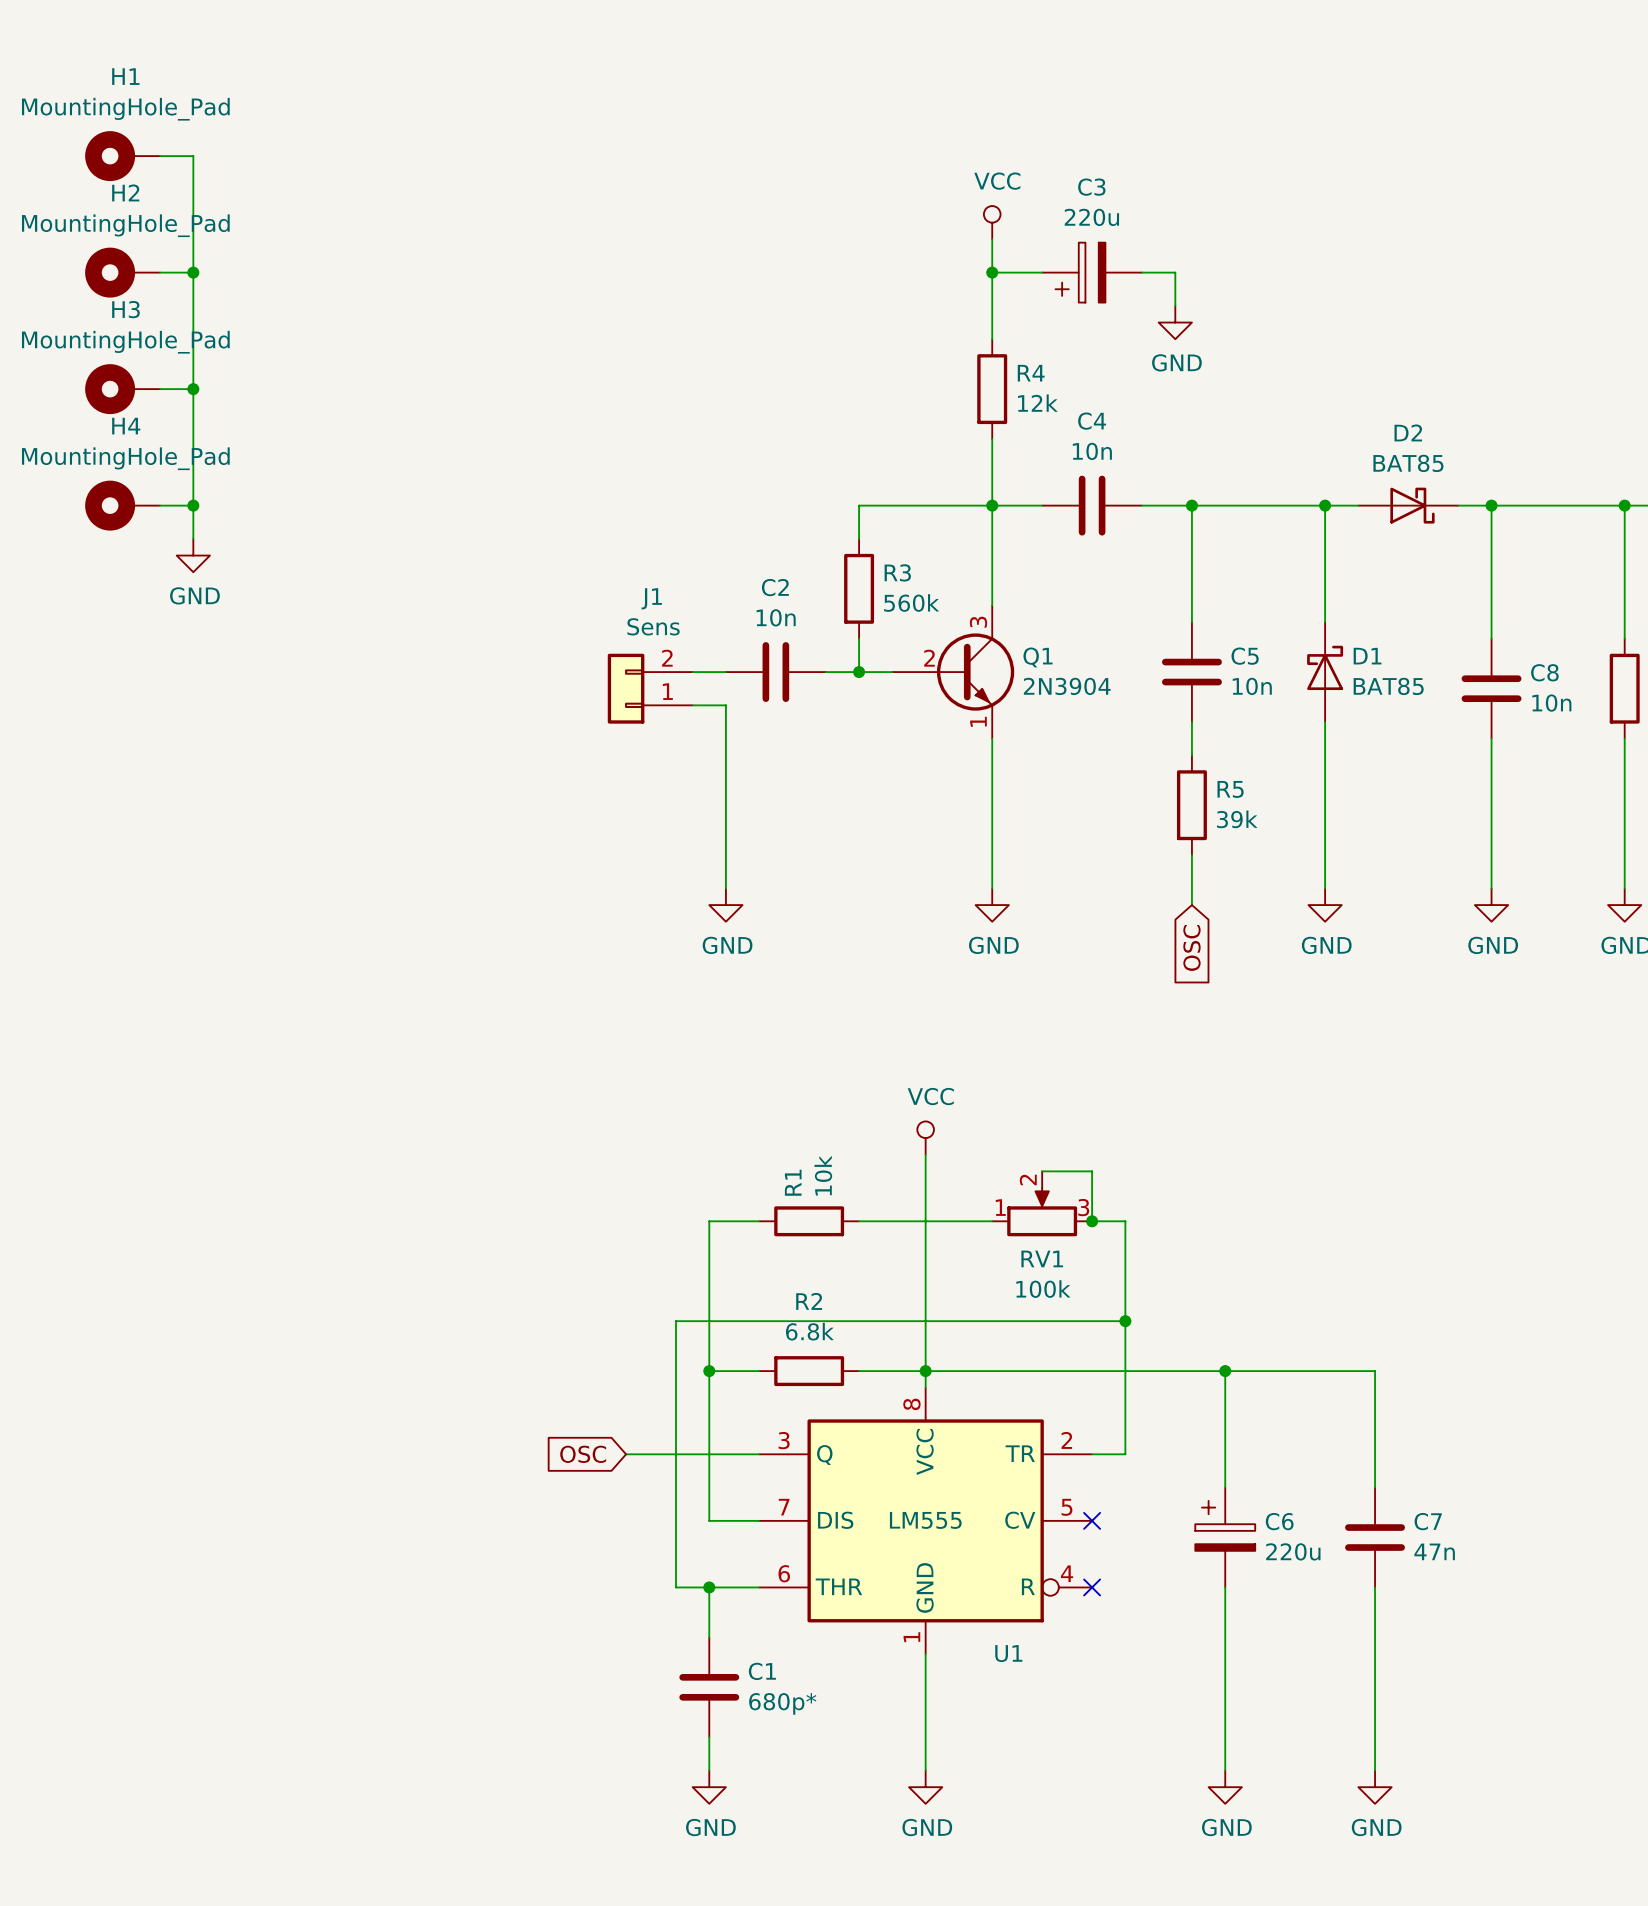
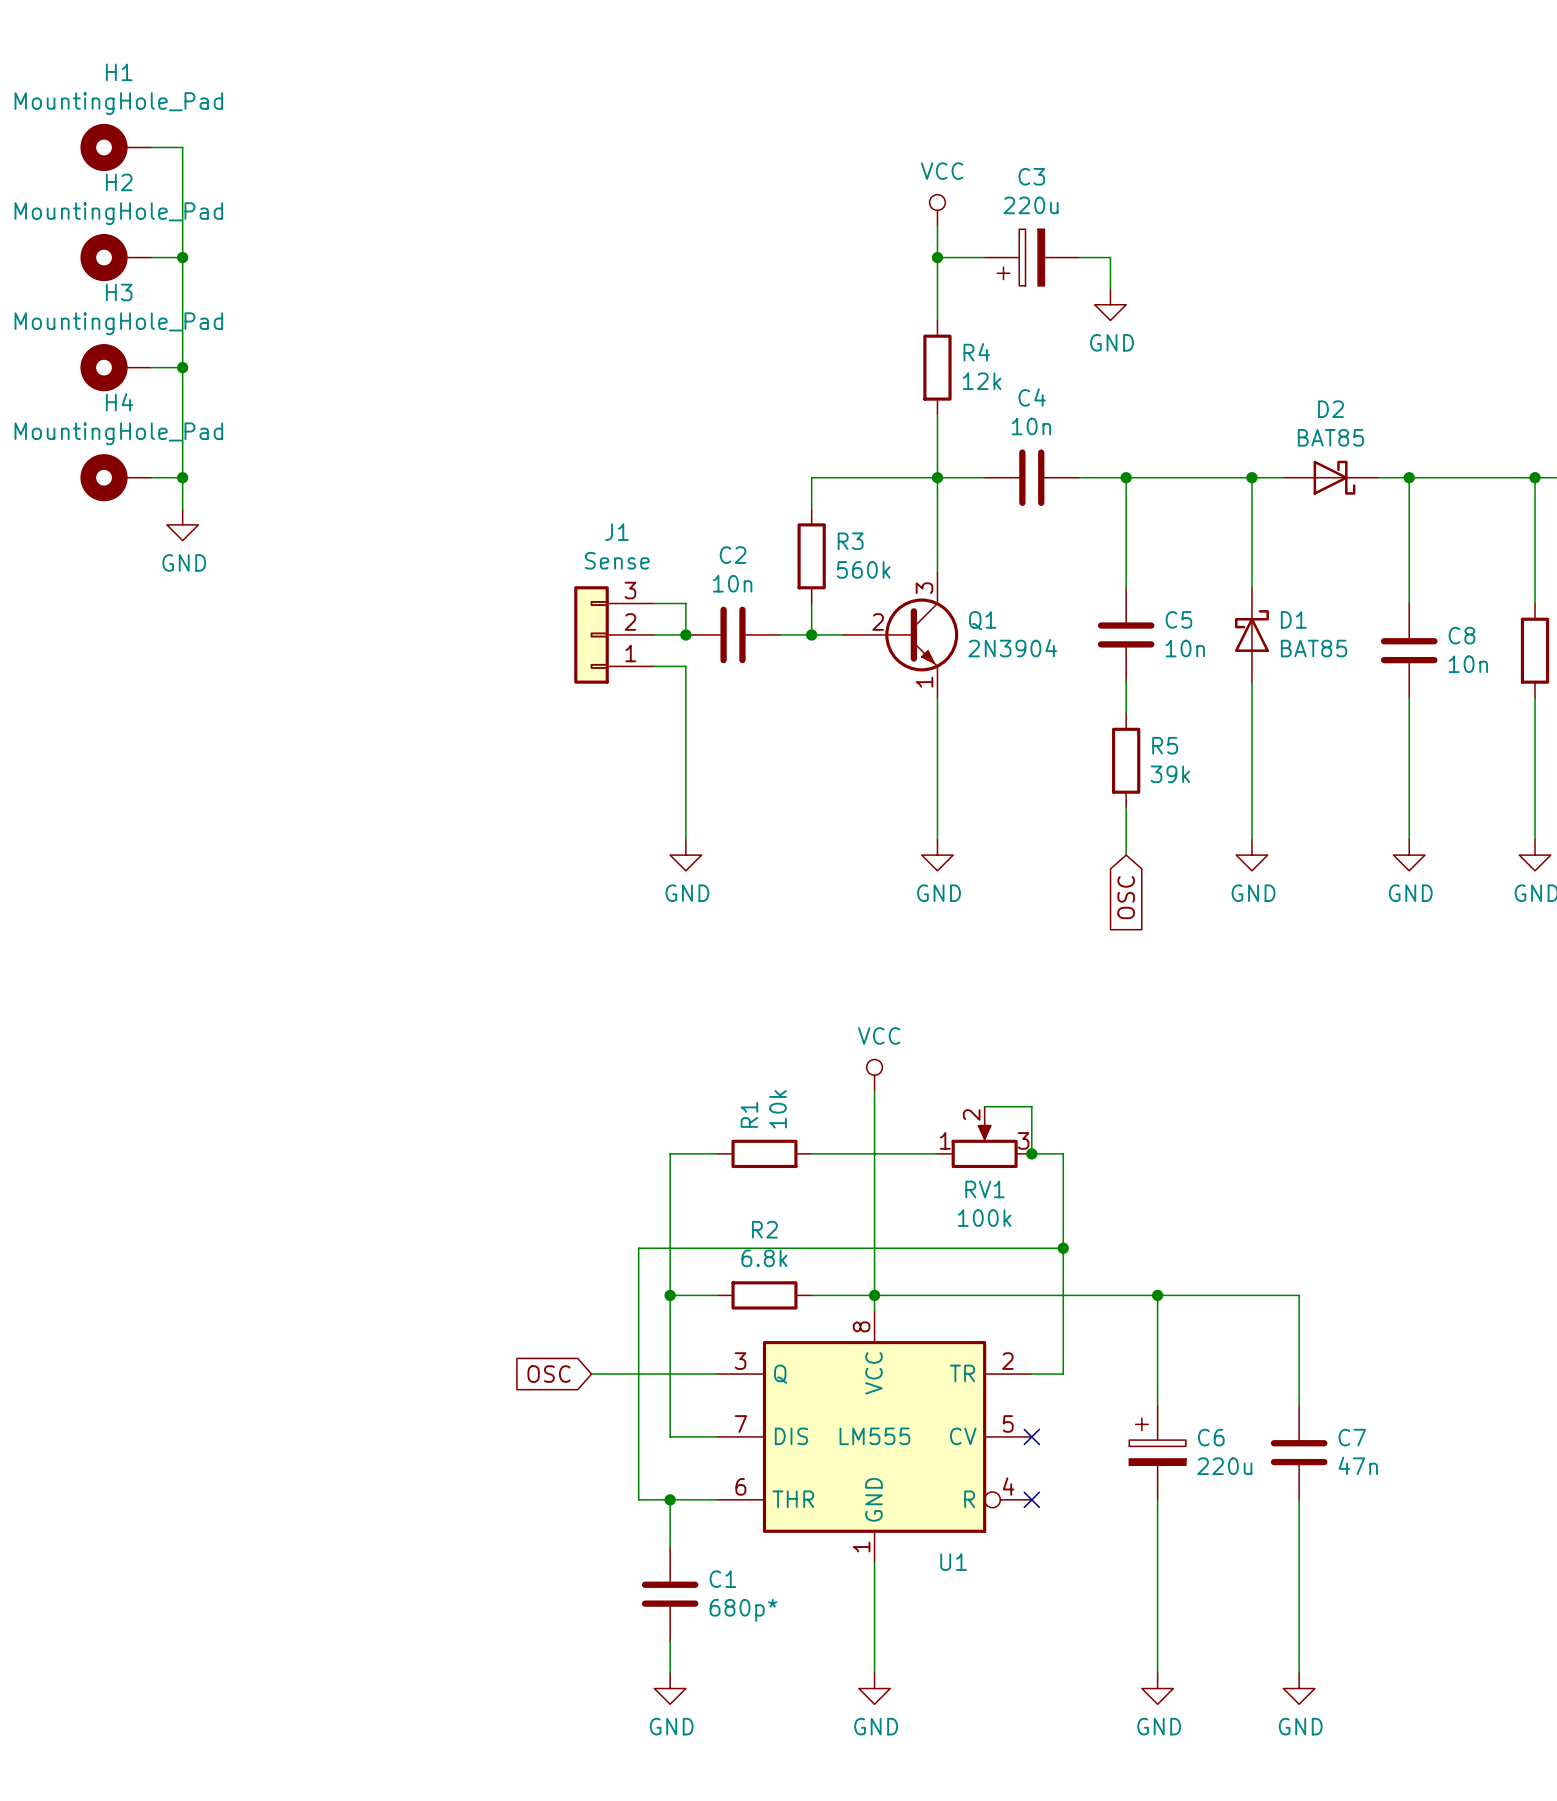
J1 value: Sens (653, 626) -> Sense (617, 560)
wire: none -> (654, 603) (685, 603) (685, 634)
J1 symbol: [607, 653, 693, 724] -> [574, 586, 655, 684]
junction: none -> (685, 634)

